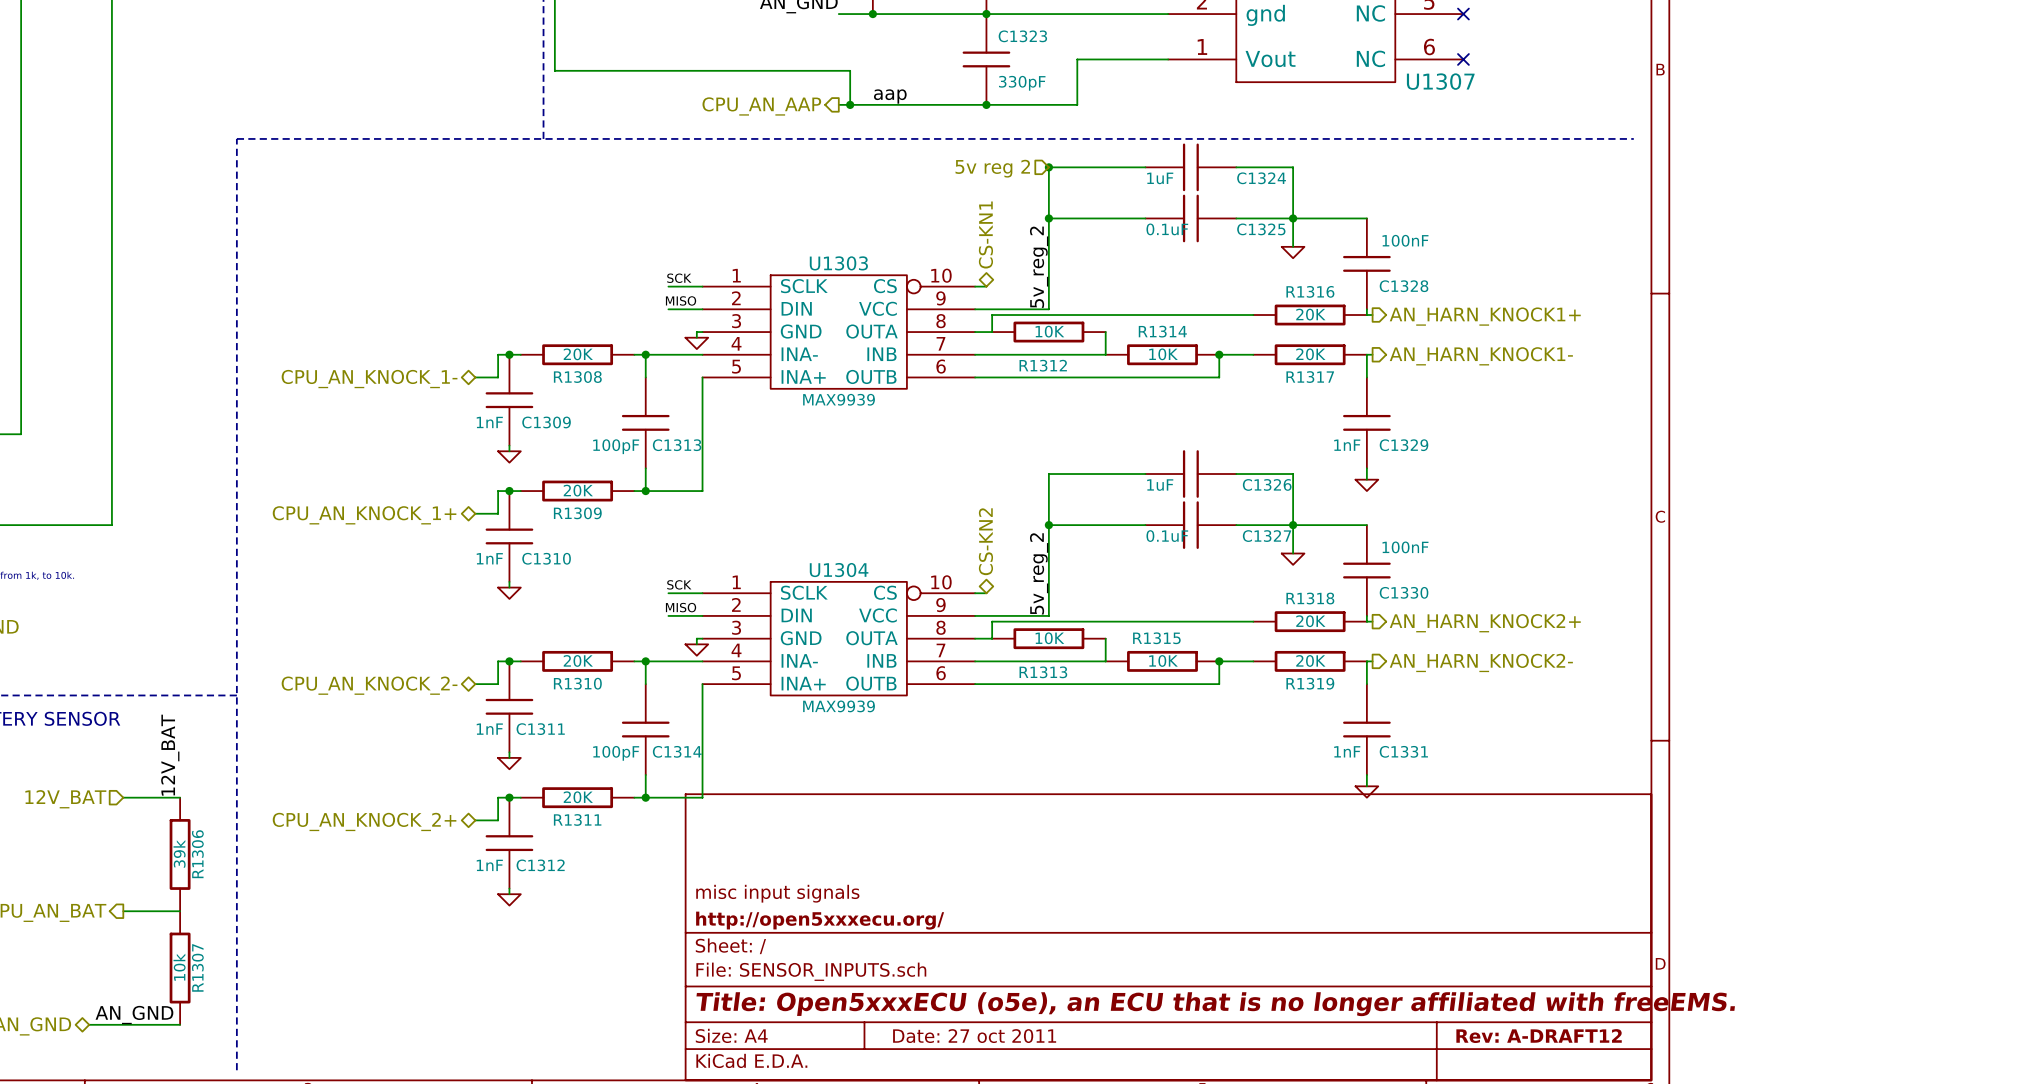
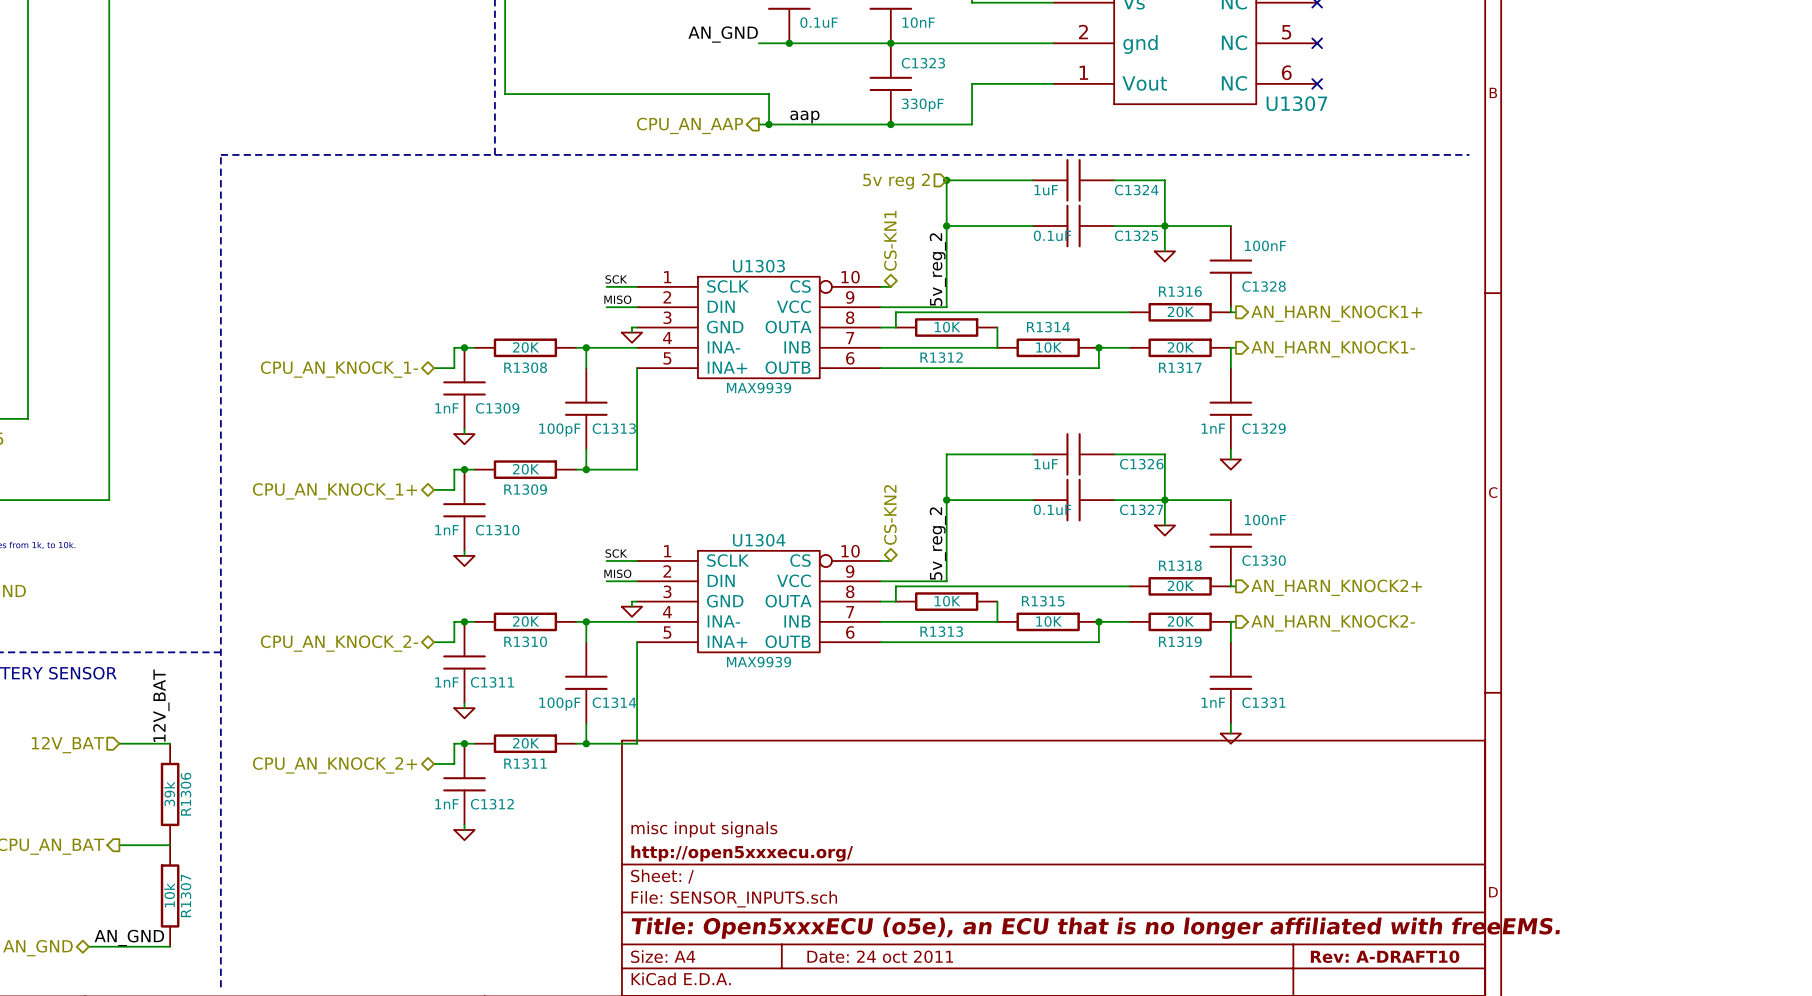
title block: Date: 27 oct 2011 (974, 1036) -> Date: 24 oct 2011 (880, 956)
title block: Rev: A-DRAFT12 (1539, 1036) -> Rev: A-DRAFT10 (1385, 956)

